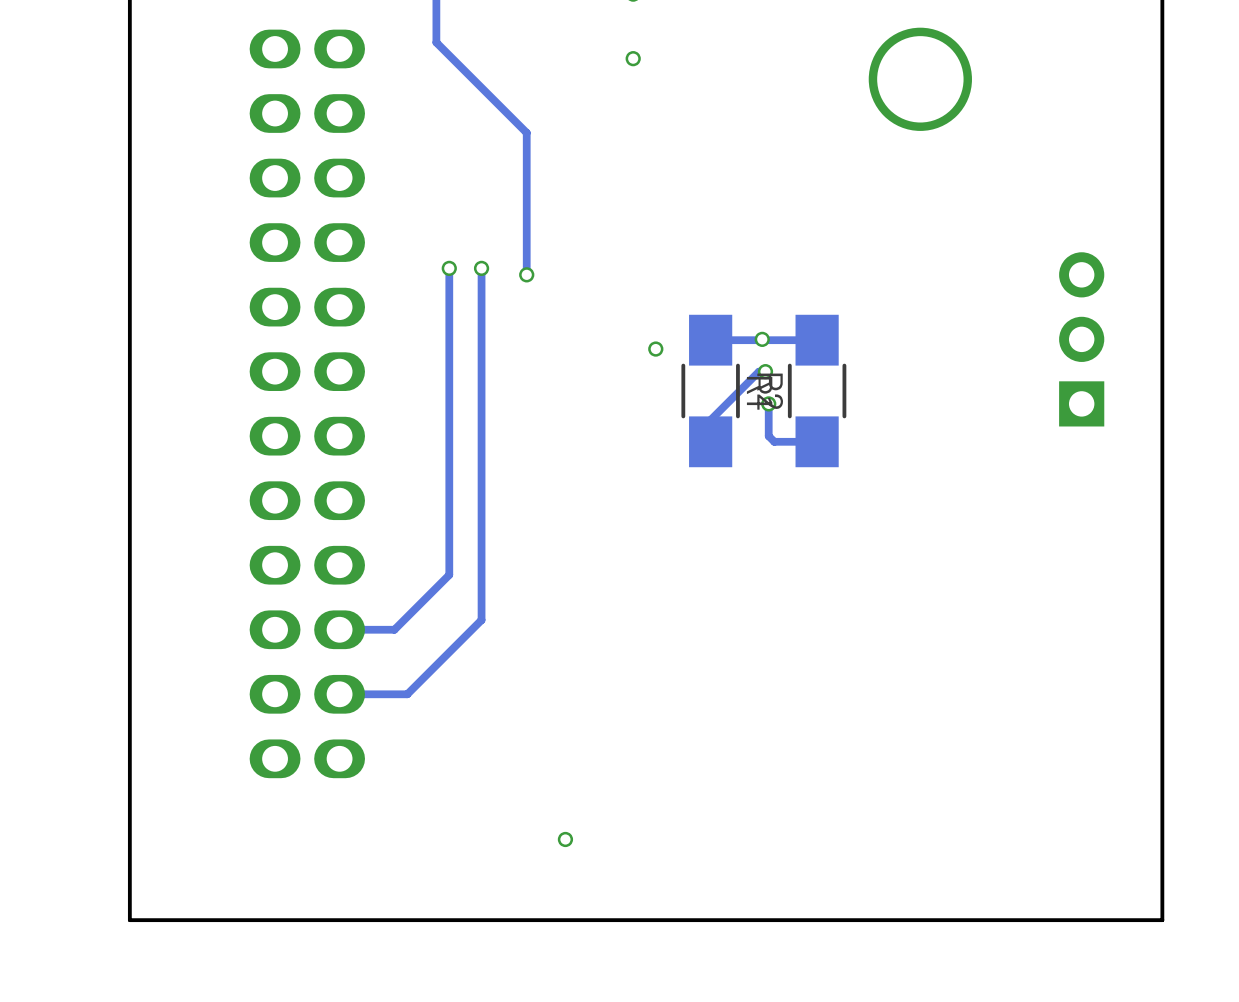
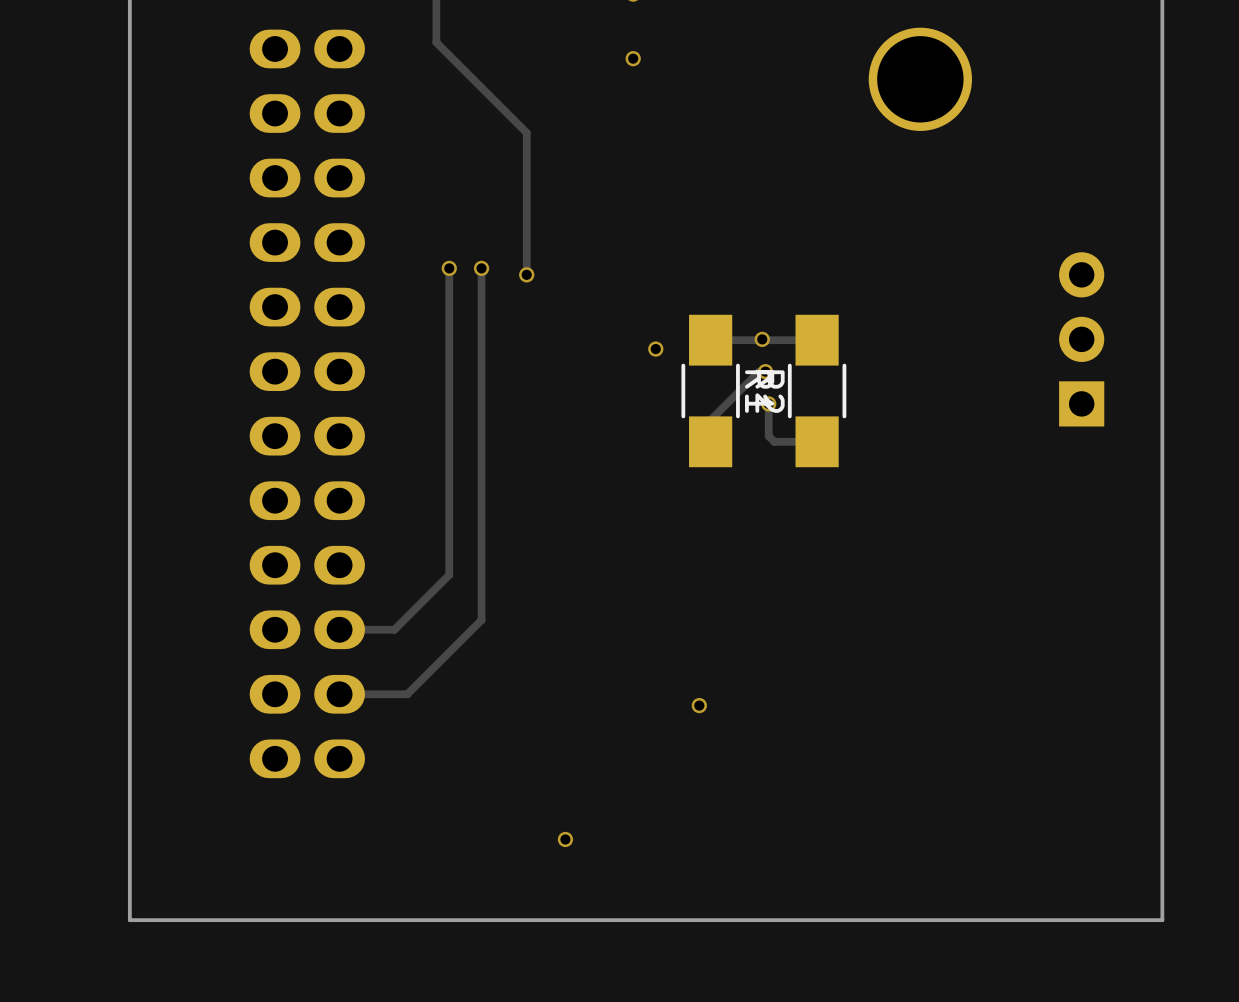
via: none -> (699, 705)

